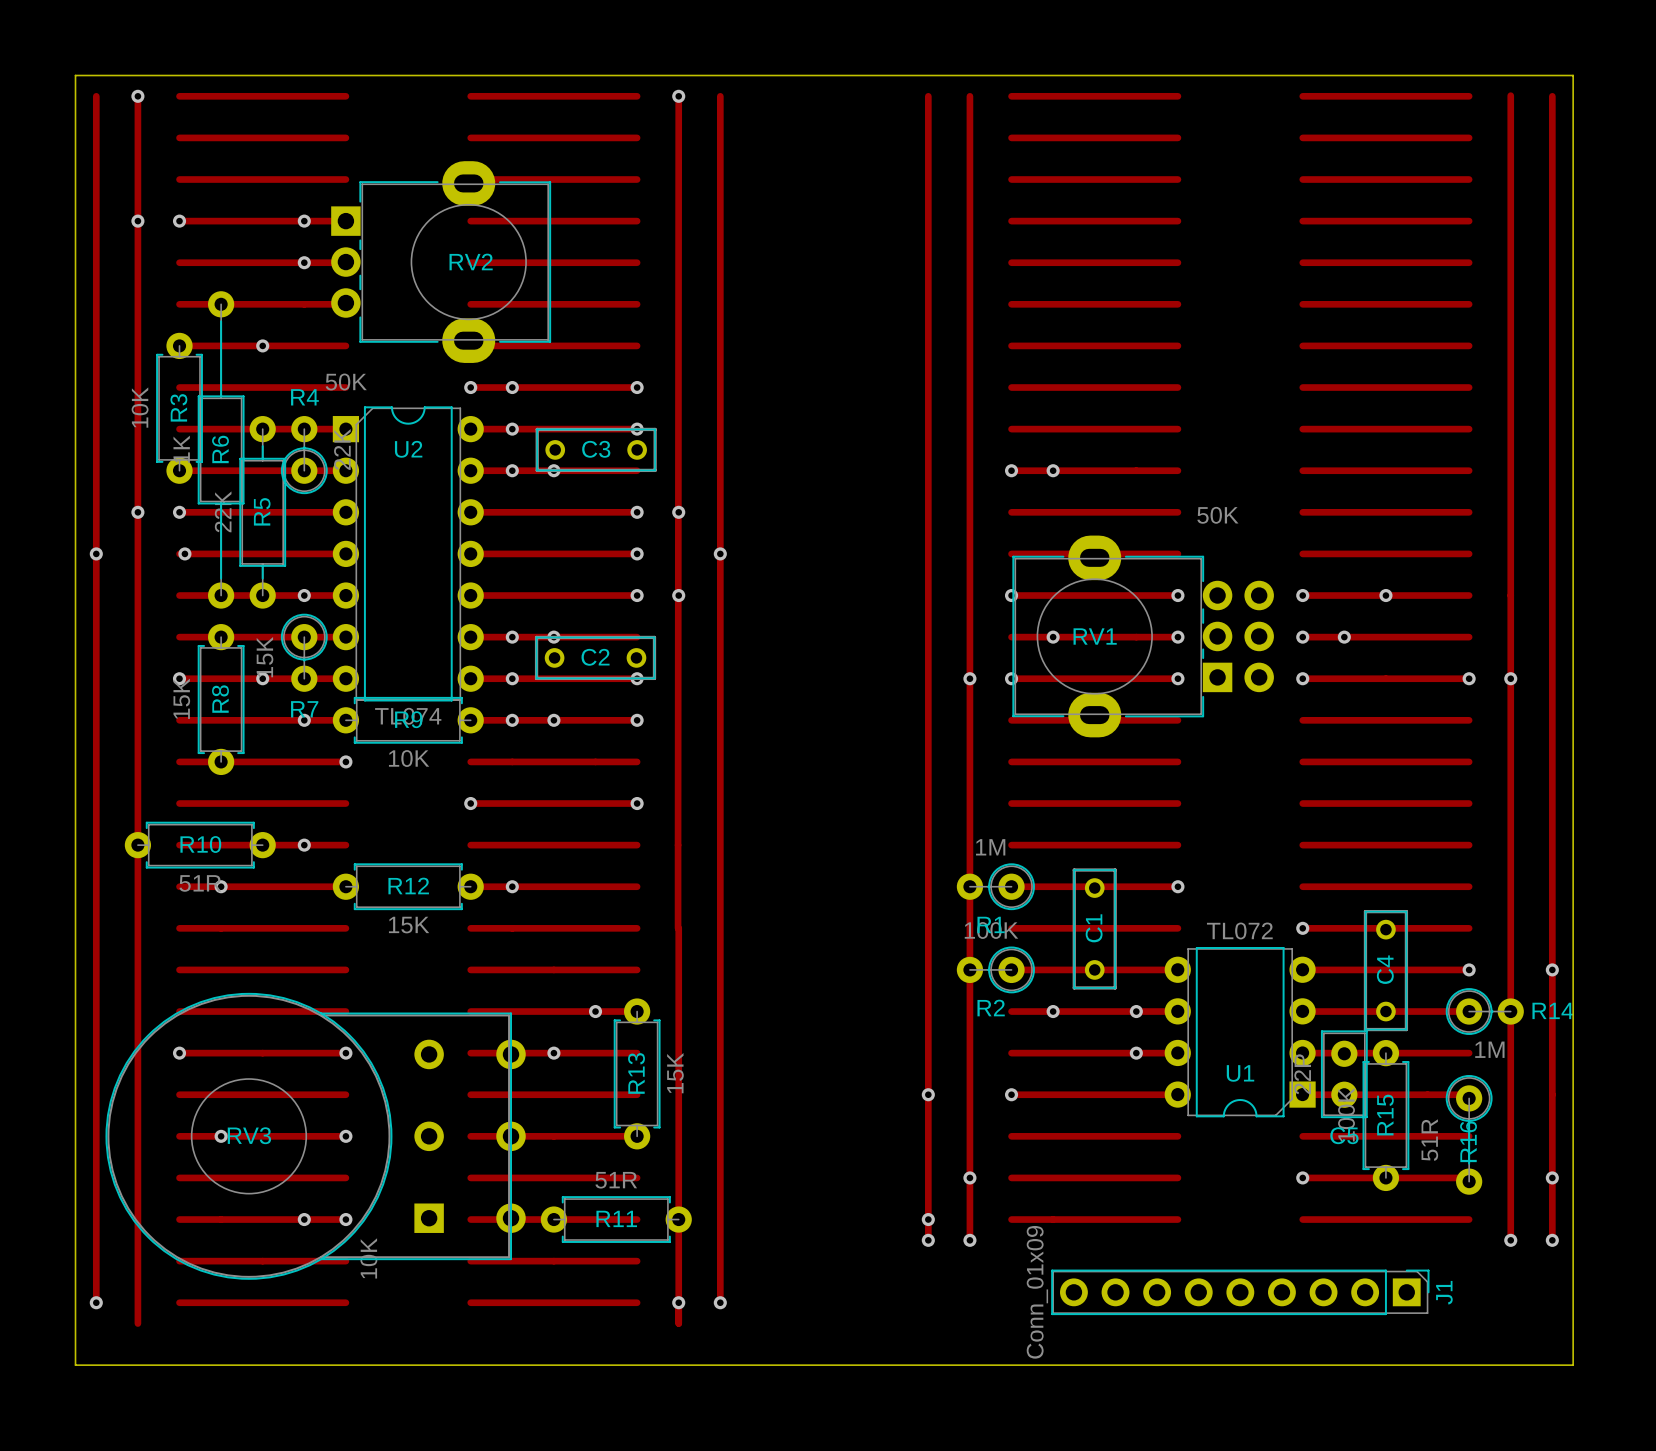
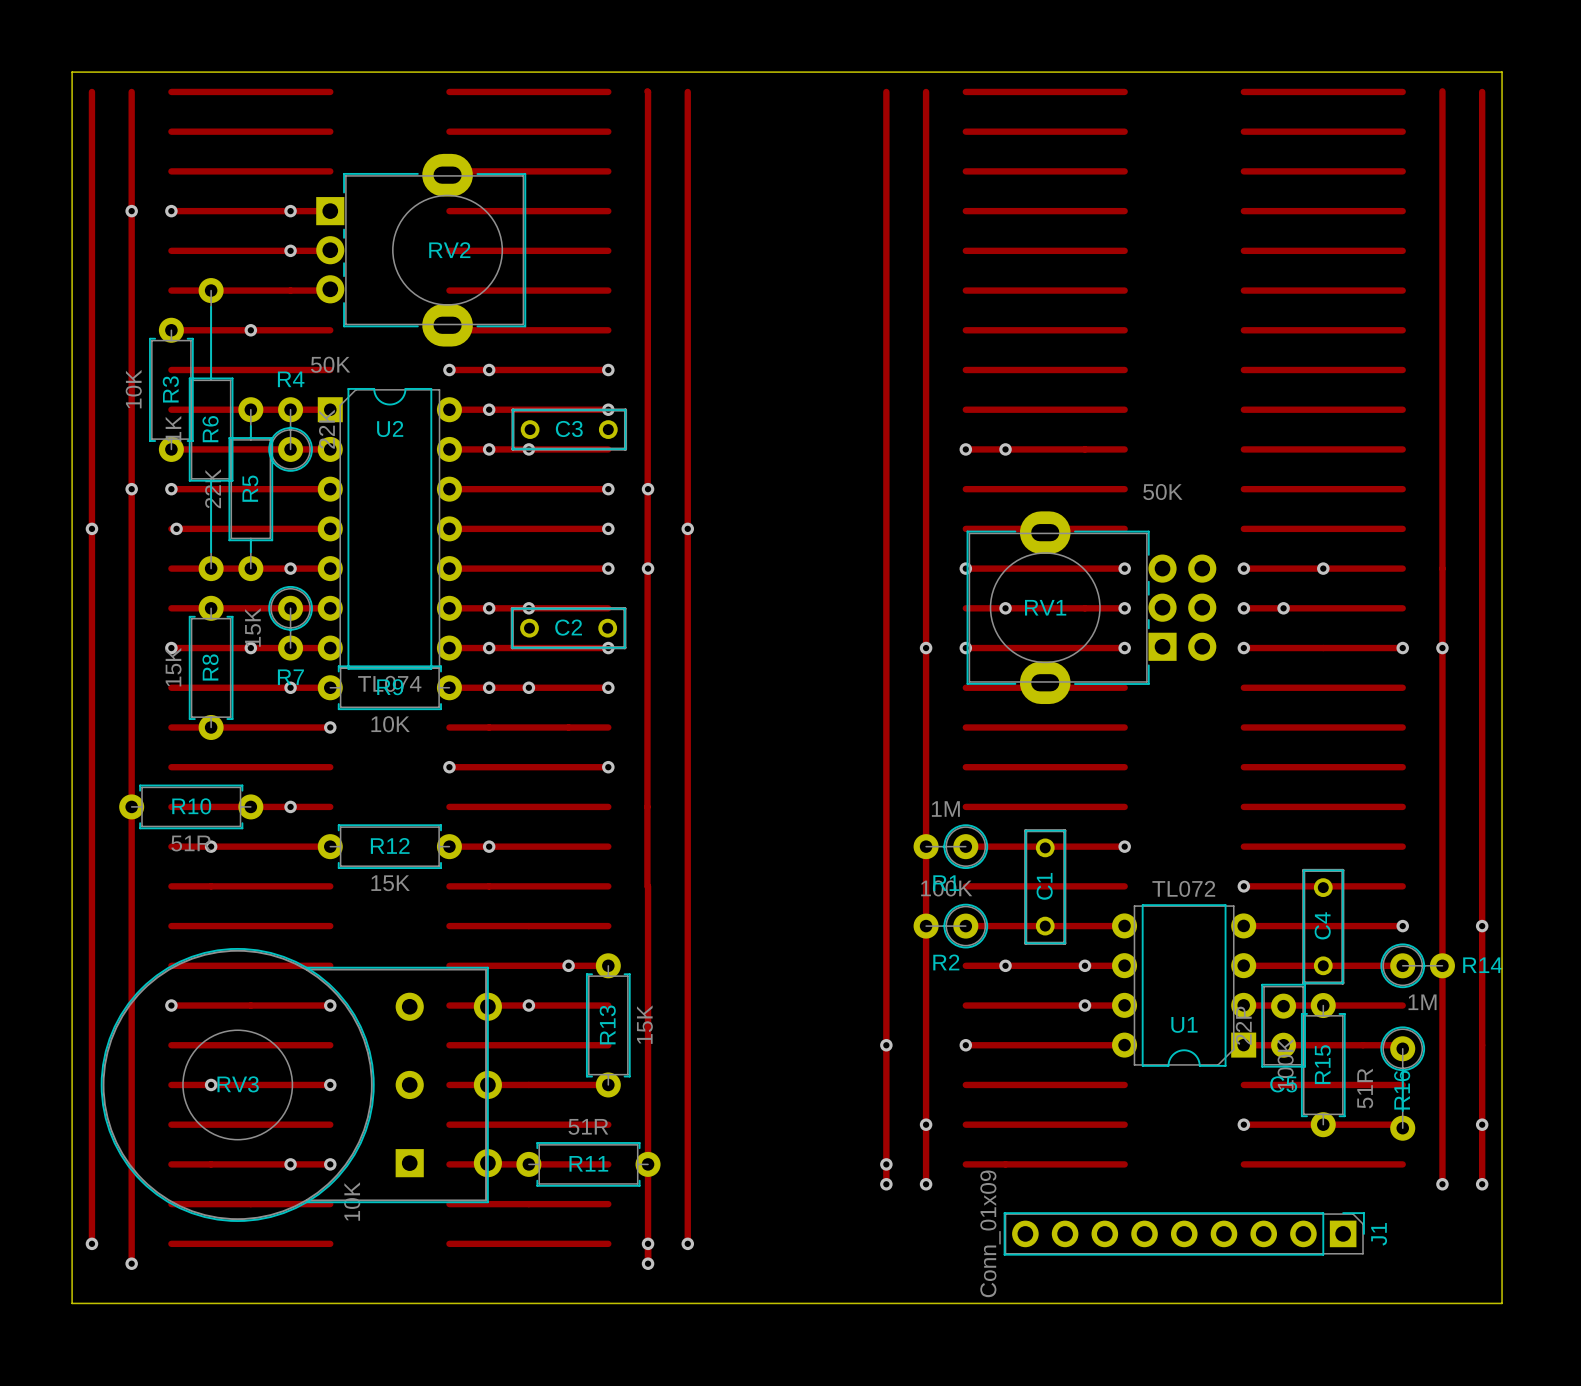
via: (137, 96) -> none
via: (678, 96) -> none
via: none -> (131, 1263)
via: none -> (648, 1263)

